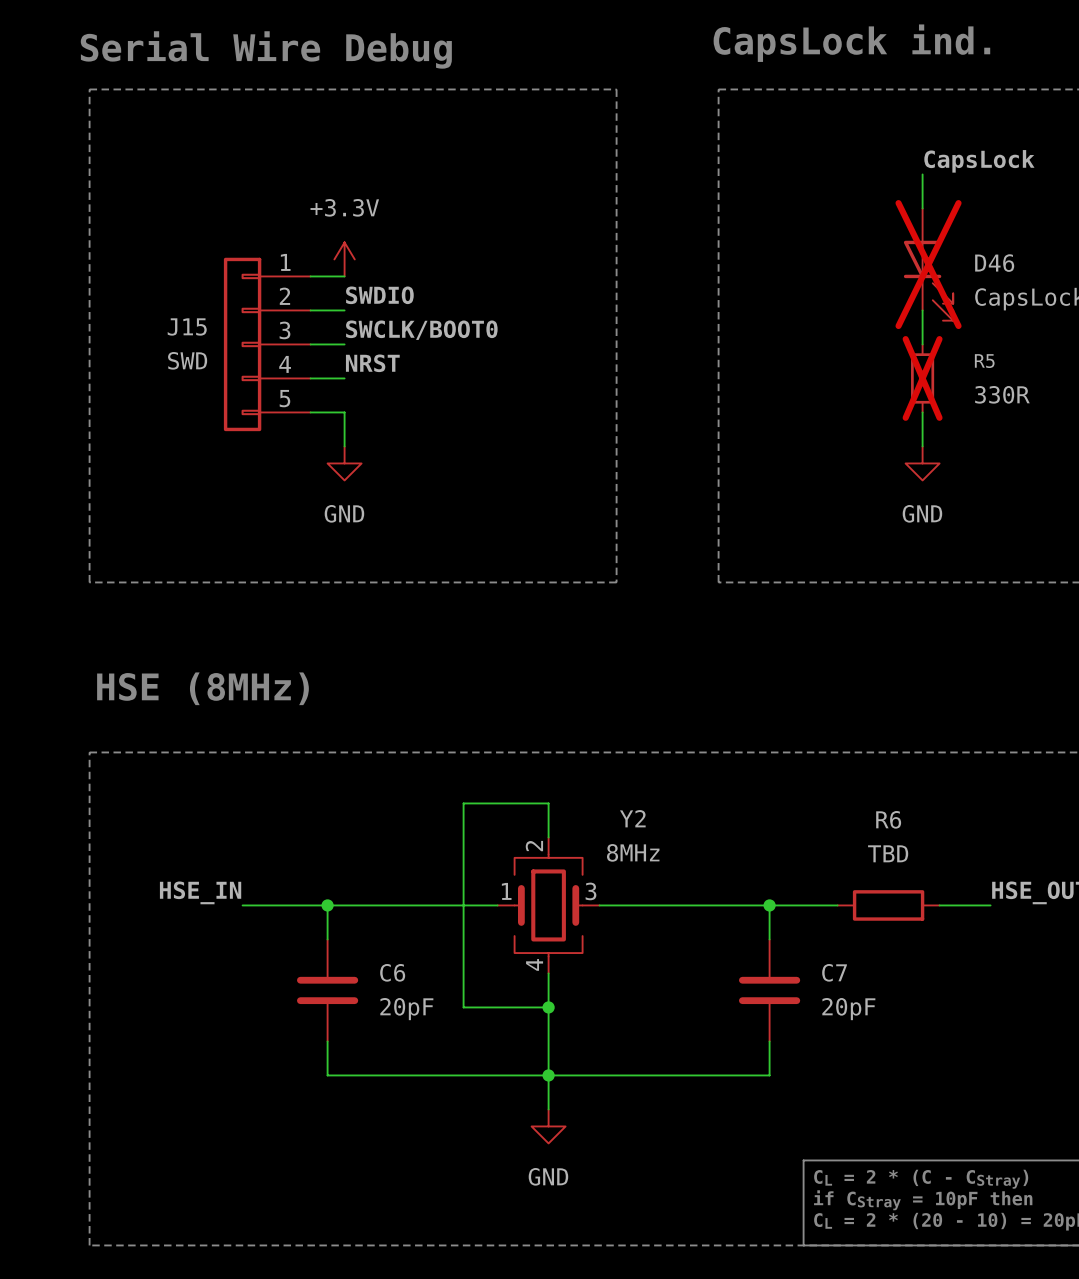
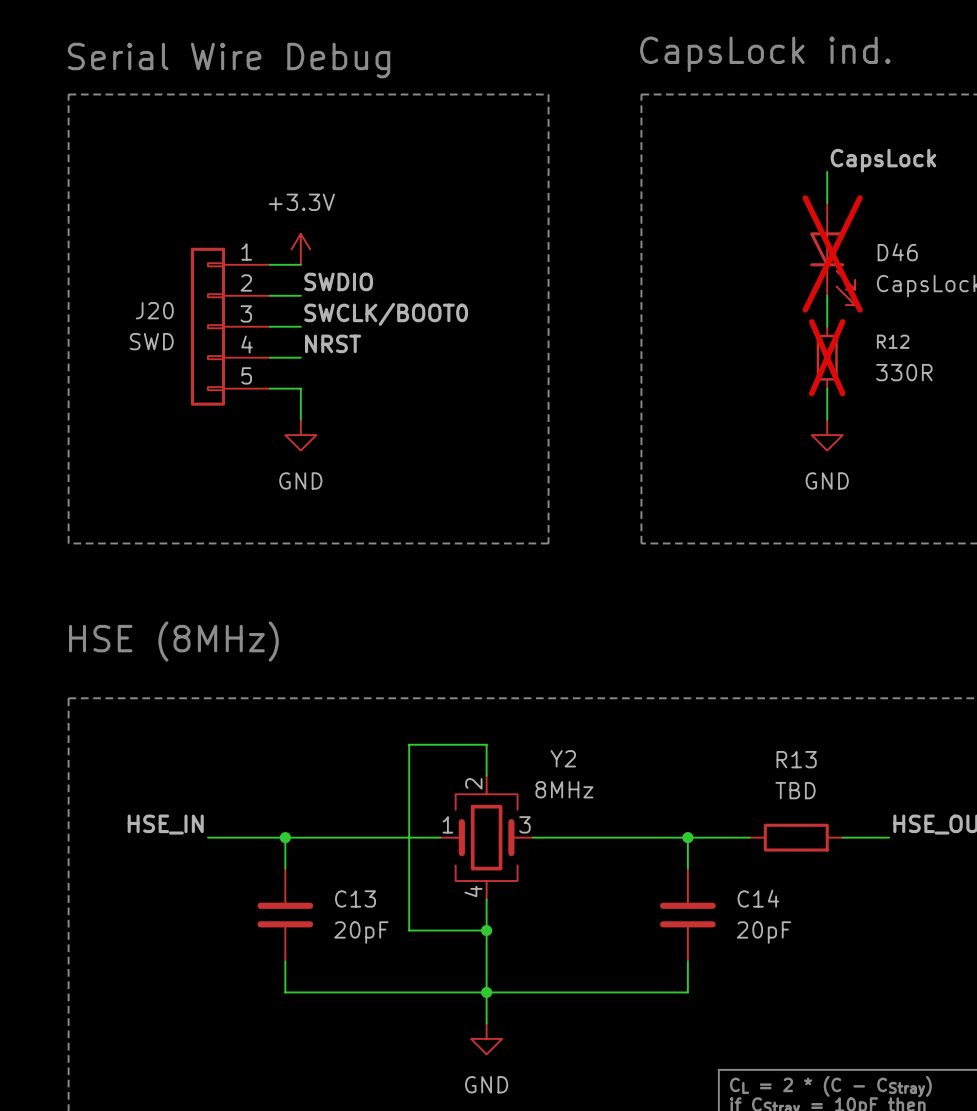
J15 name: J15 (187, 326) -> J20 (154, 310)
R5 name: R5 (984, 361) -> R12 (893, 341)
R6 name: R6 (888, 819) -> R13 (796, 759)
C6 name: C6 (392, 972) -> C13 (355, 898)
C7 name: C7 (834, 972) -> C14 (758, 898)

